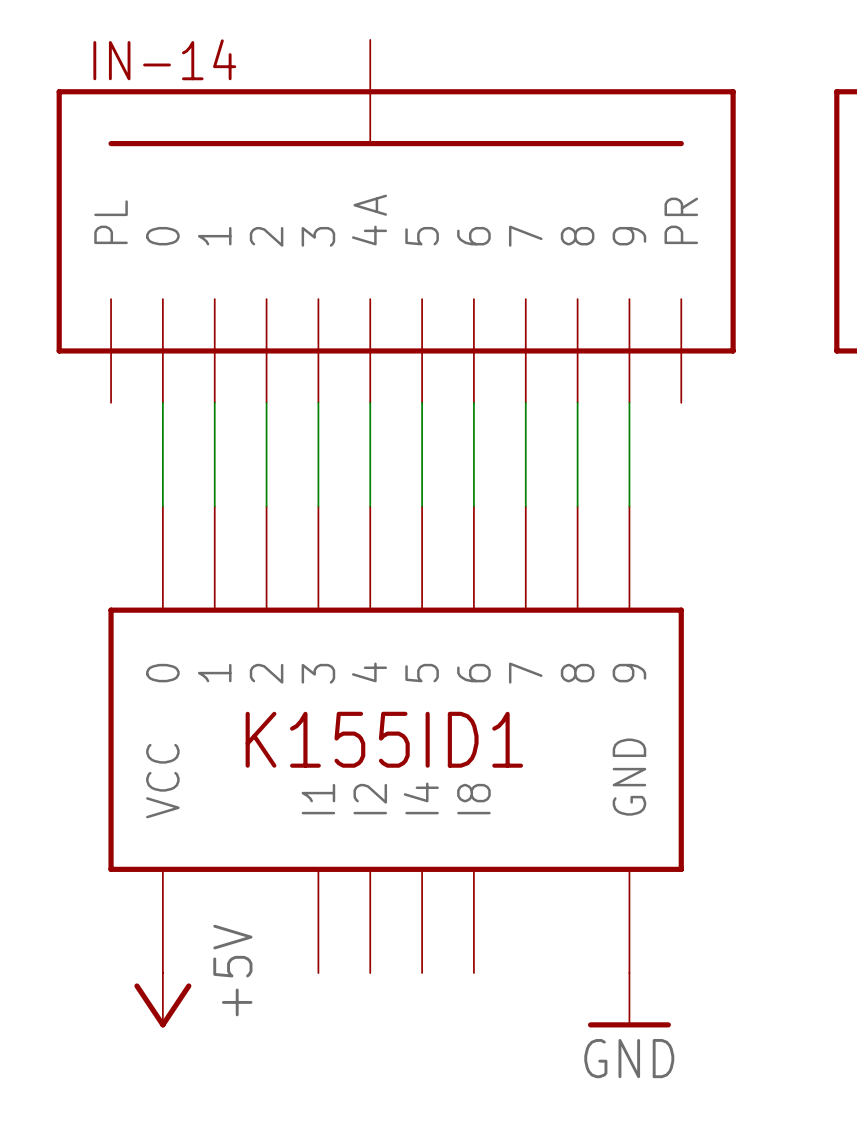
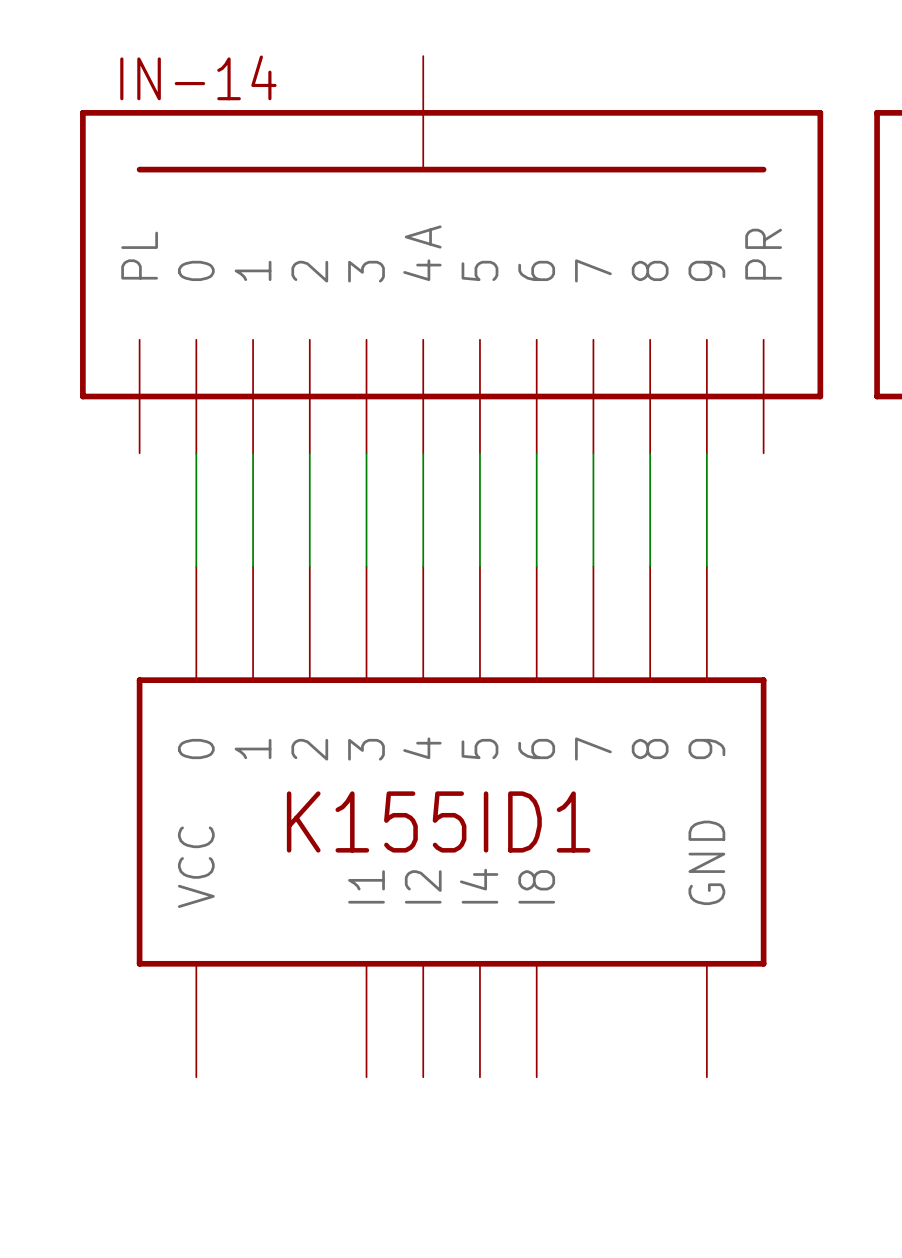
part position: (396, 221) -> (451, 254)
wire: (162, 402) (162, 506) -> none
wire: none -> (706, 453) (706, 566)
part position: (396, 739) -> (451, 821)
power symbol: +5V (162, 1000) -> none
power symbol: GND (629, 1000) -> none

